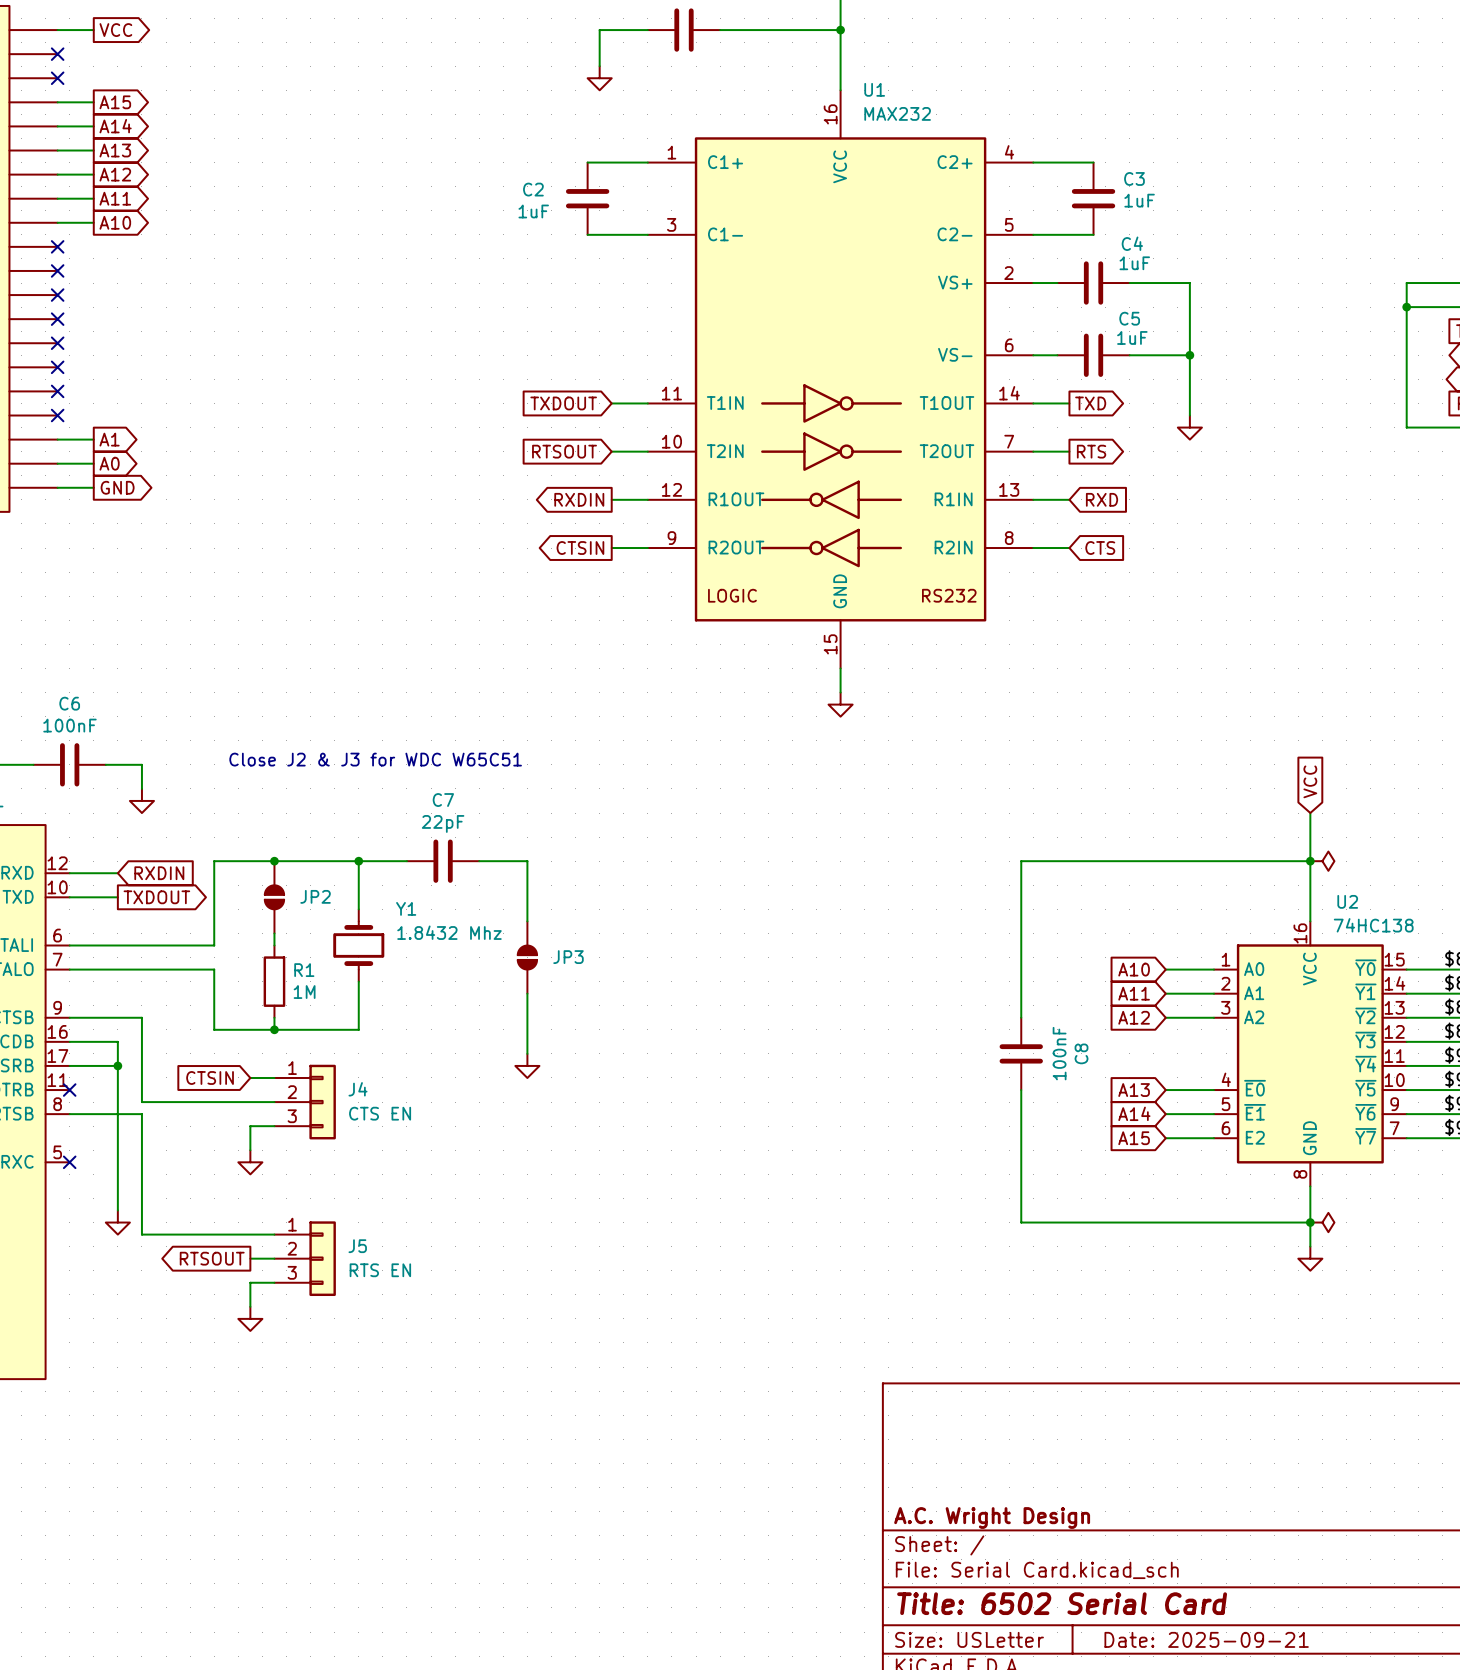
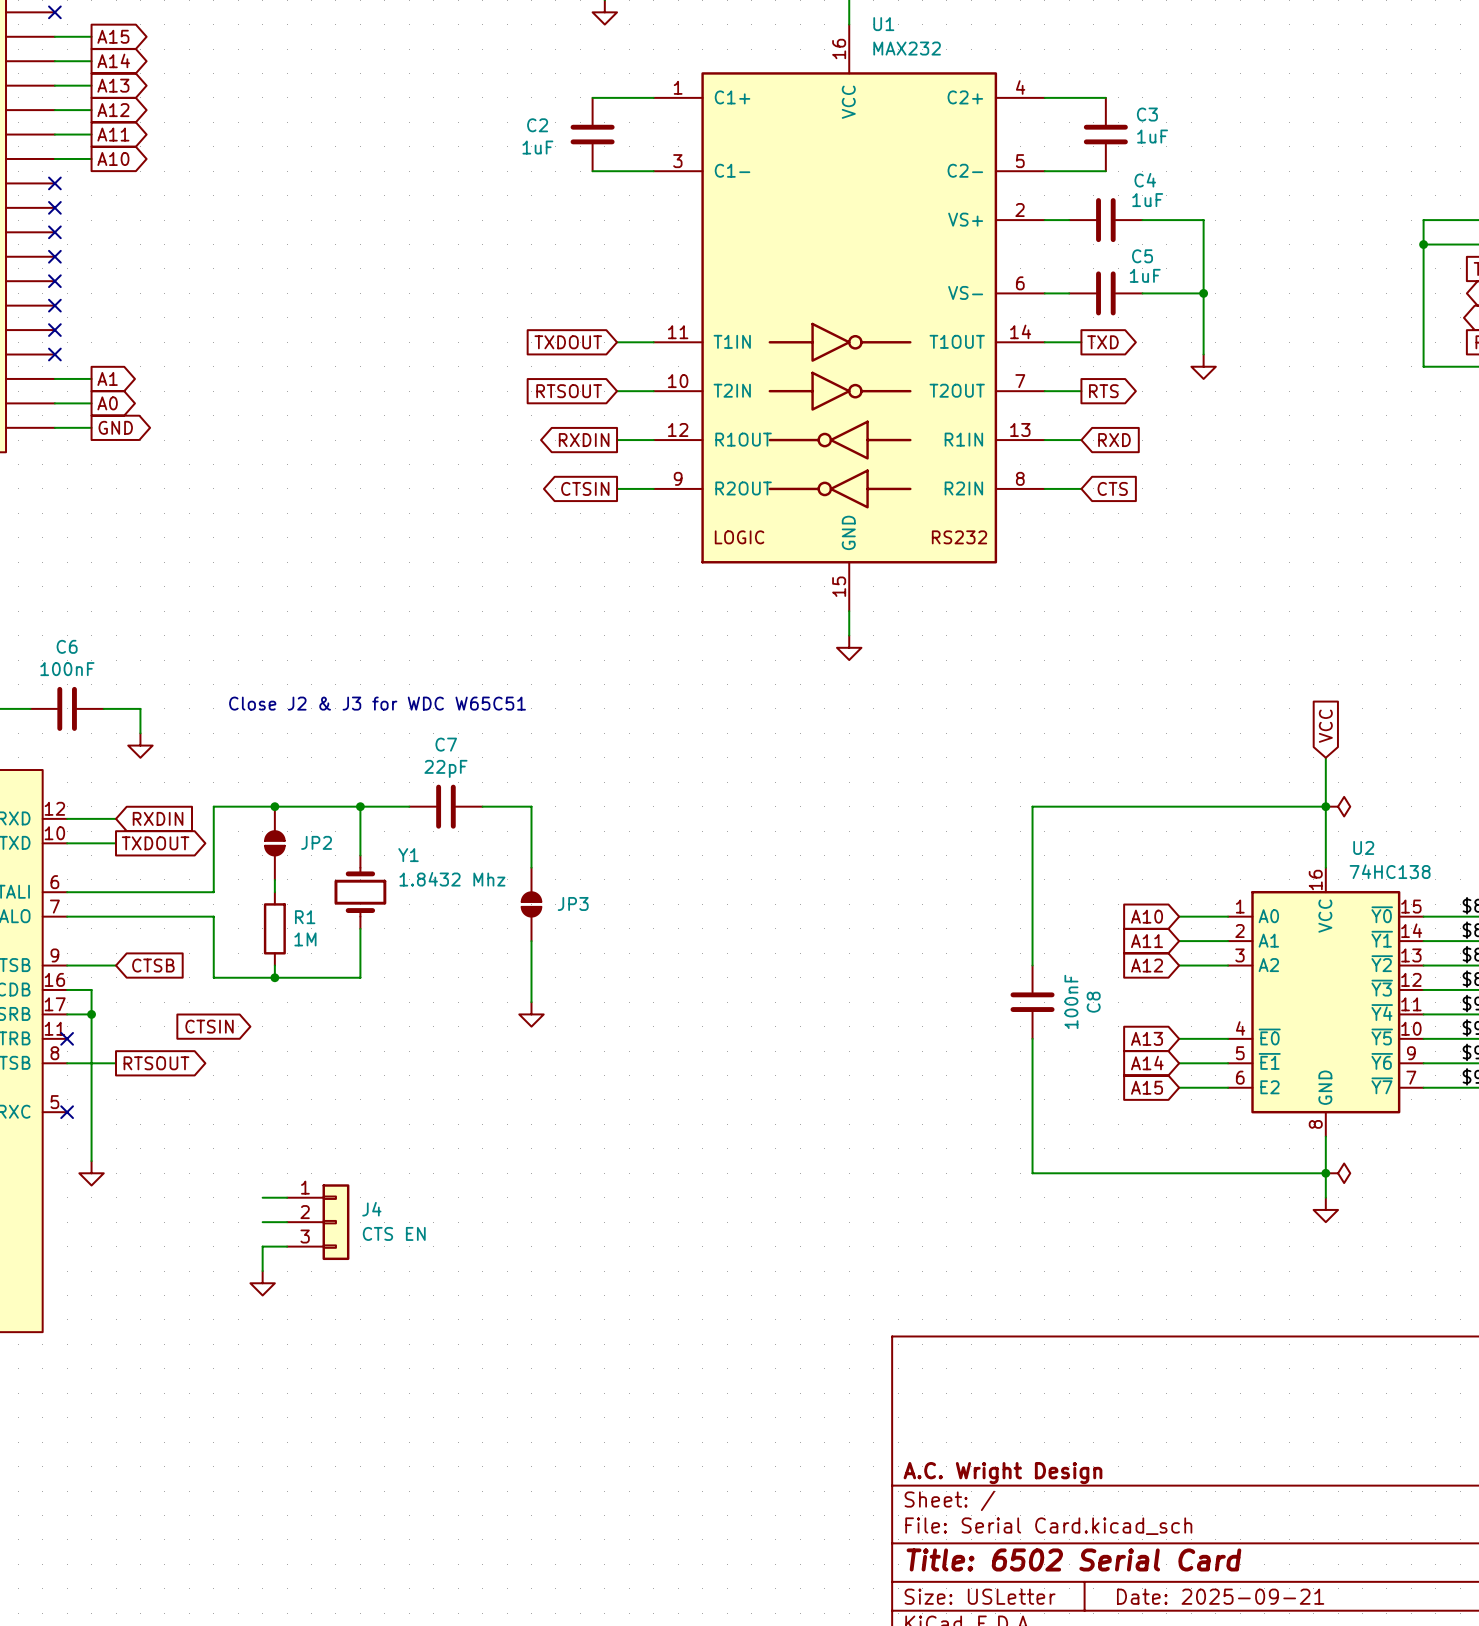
wire: (117, 1017) (141, 1017) (141, 1102) (274, 1102) -> none
global label: none -> CTSB (153, 965)
wire: (93, 1041) (117, 1041) (117, 1210) -> (91, 989) (91, 1161)
wire: (93, 1065) (117, 1065) -> none
junction position: (117, 1065) -> (91, 1014)
wire: (250, 1077) (274, 1077) -> (262, 1197) (287, 1197)
J4 position: (305, 1102) -> (318, 1222)
wire: (117, 1114) (141, 1114) (141, 1234) (274, 1234) -> none
wire: (274, 1126) (250, 1126) (250, 1150) -> none
power symbol: (250, 1162) -> none
power symbol position: (117, 1222) -> (91, 1173)
global label rotation: 0° (212, 1258) -> 180° (156, 1063)
global label position: RTSOUT (212, 1258) -> RTSOUT (156, 1063)
wire: (250, 1258) (274, 1258) -> (262, 1222) (287, 1222)
J5: RTS EN (305, 1258) -> none
wire: (274, 1282) (250, 1282) (250, 1306) -> (287, 1246) (262, 1246) (262, 1271)
power symbol position: (250, 1318) -> (262, 1283)

